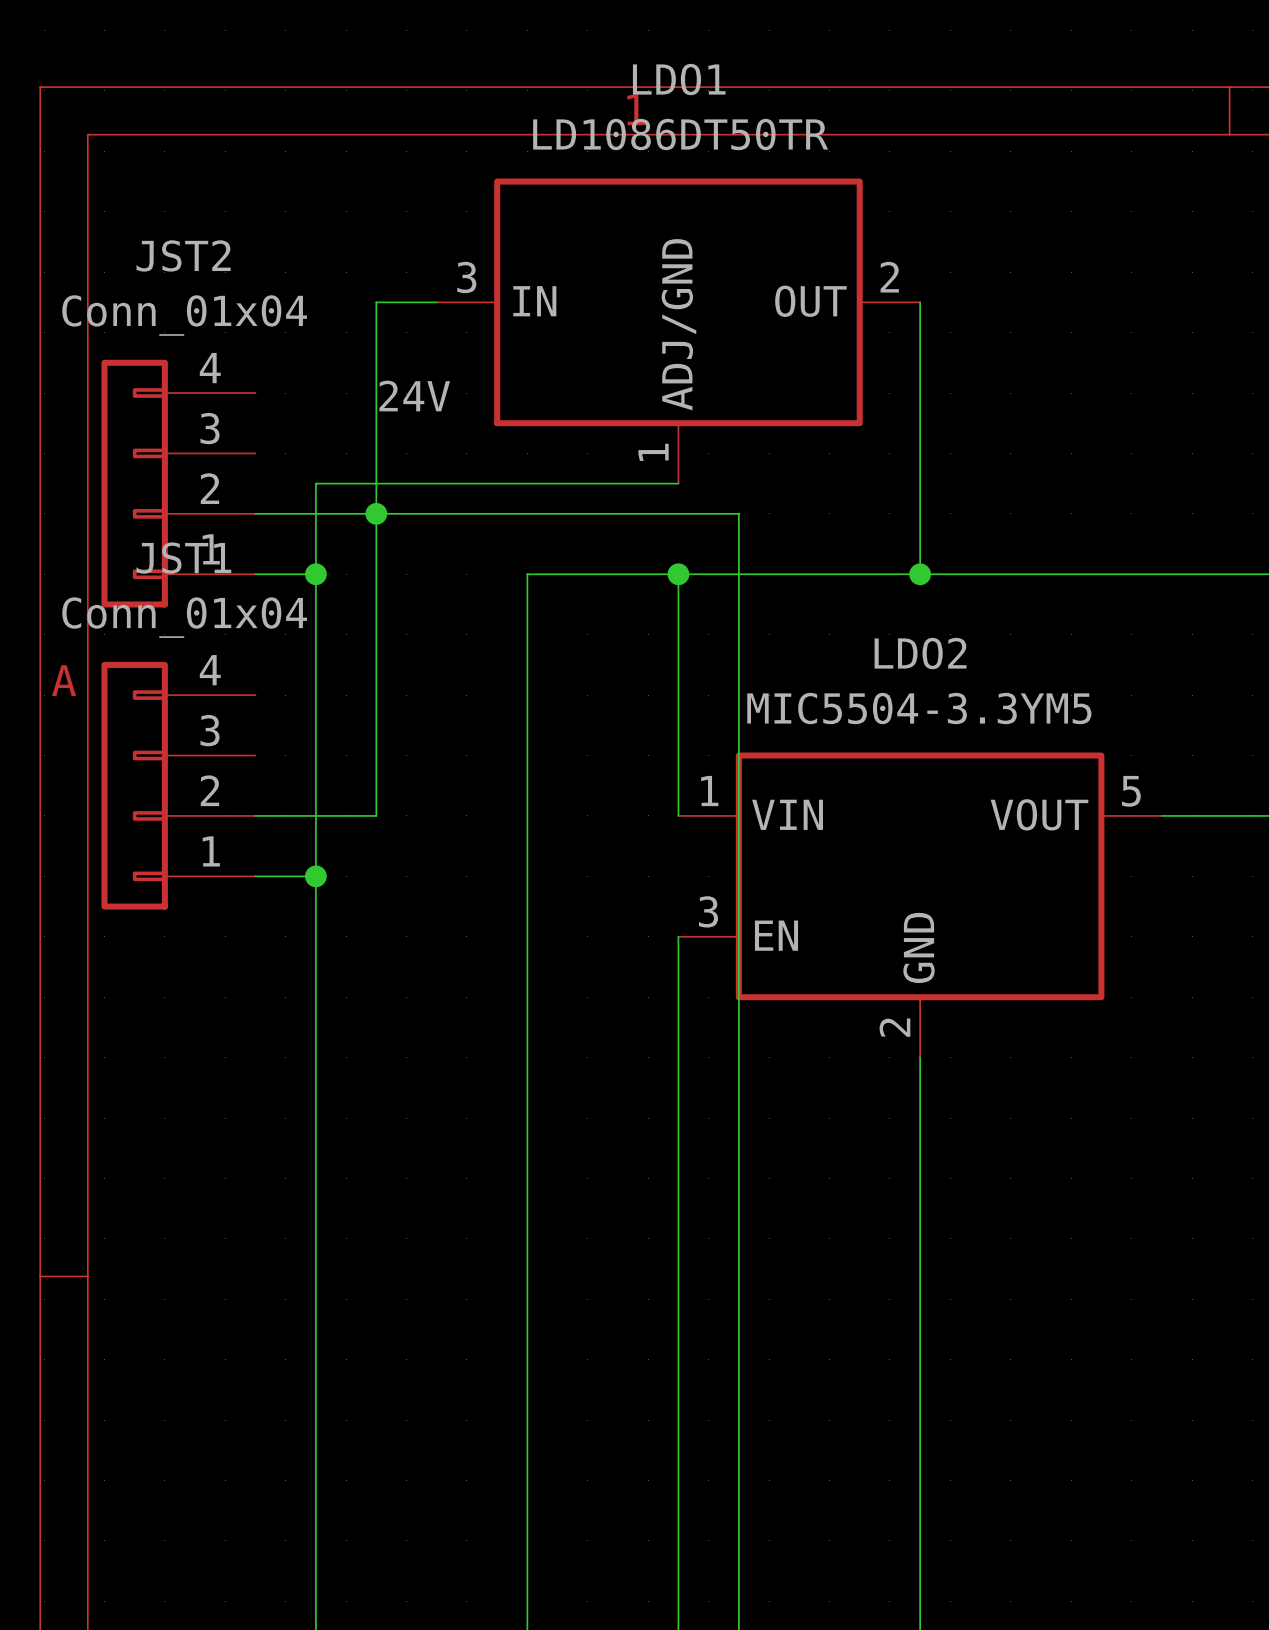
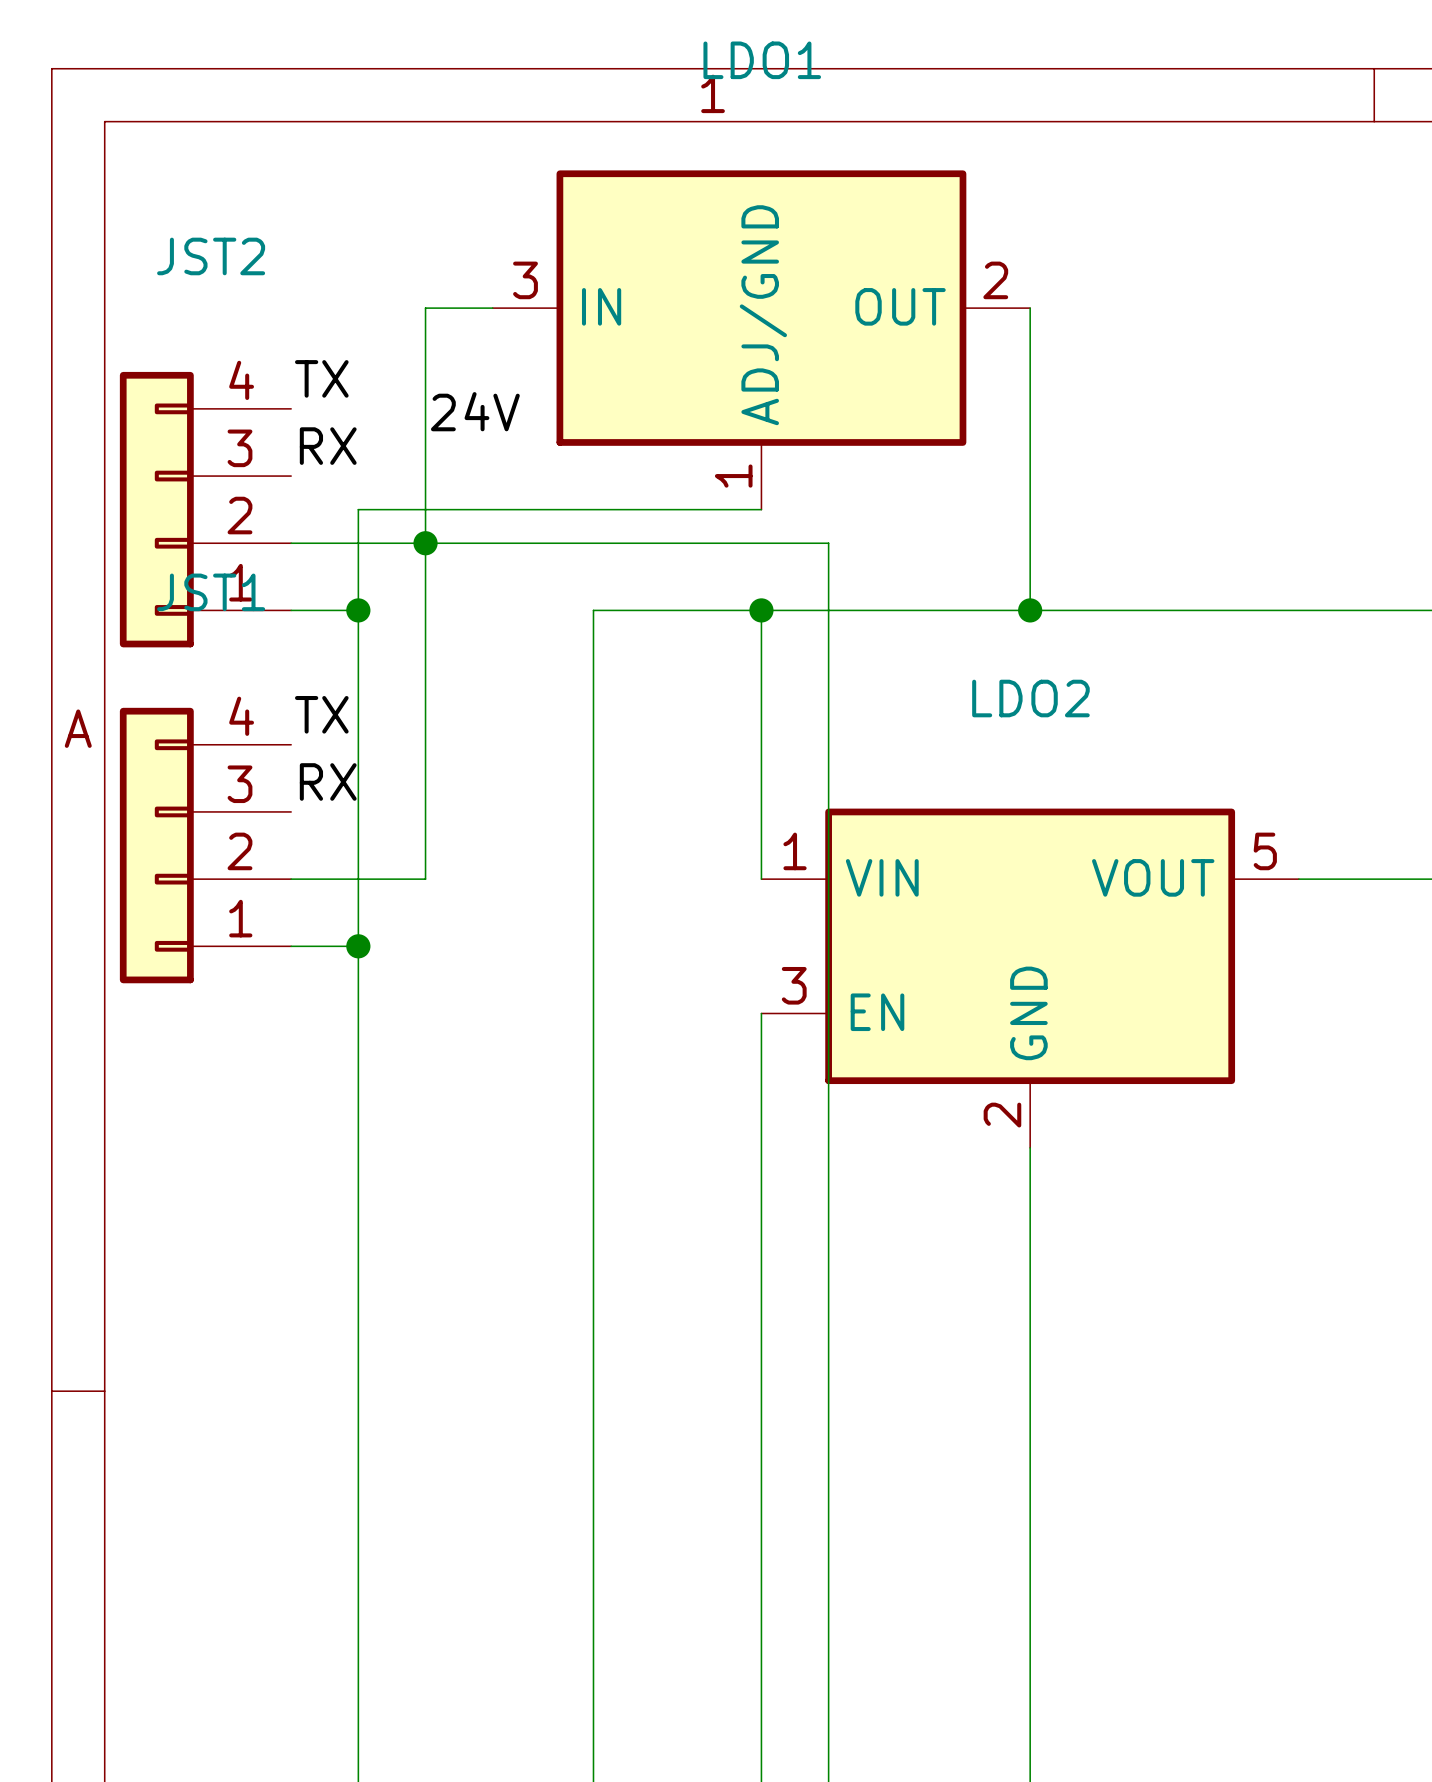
LDO1 value: LD1086DT50TR (680, 134) -> none
JST2 value: Conn_01x04 (184, 315) -> none
label: none -> TX (321, 378)
label: none -> RX (328, 446)
JST1 value: Conn_01x04 (184, 617) -> none
label: none -> TX (321, 714)
LDO2 value: MIC5504-3.3YM5 (919, 708) -> none
label: none -> RX (328, 781)

